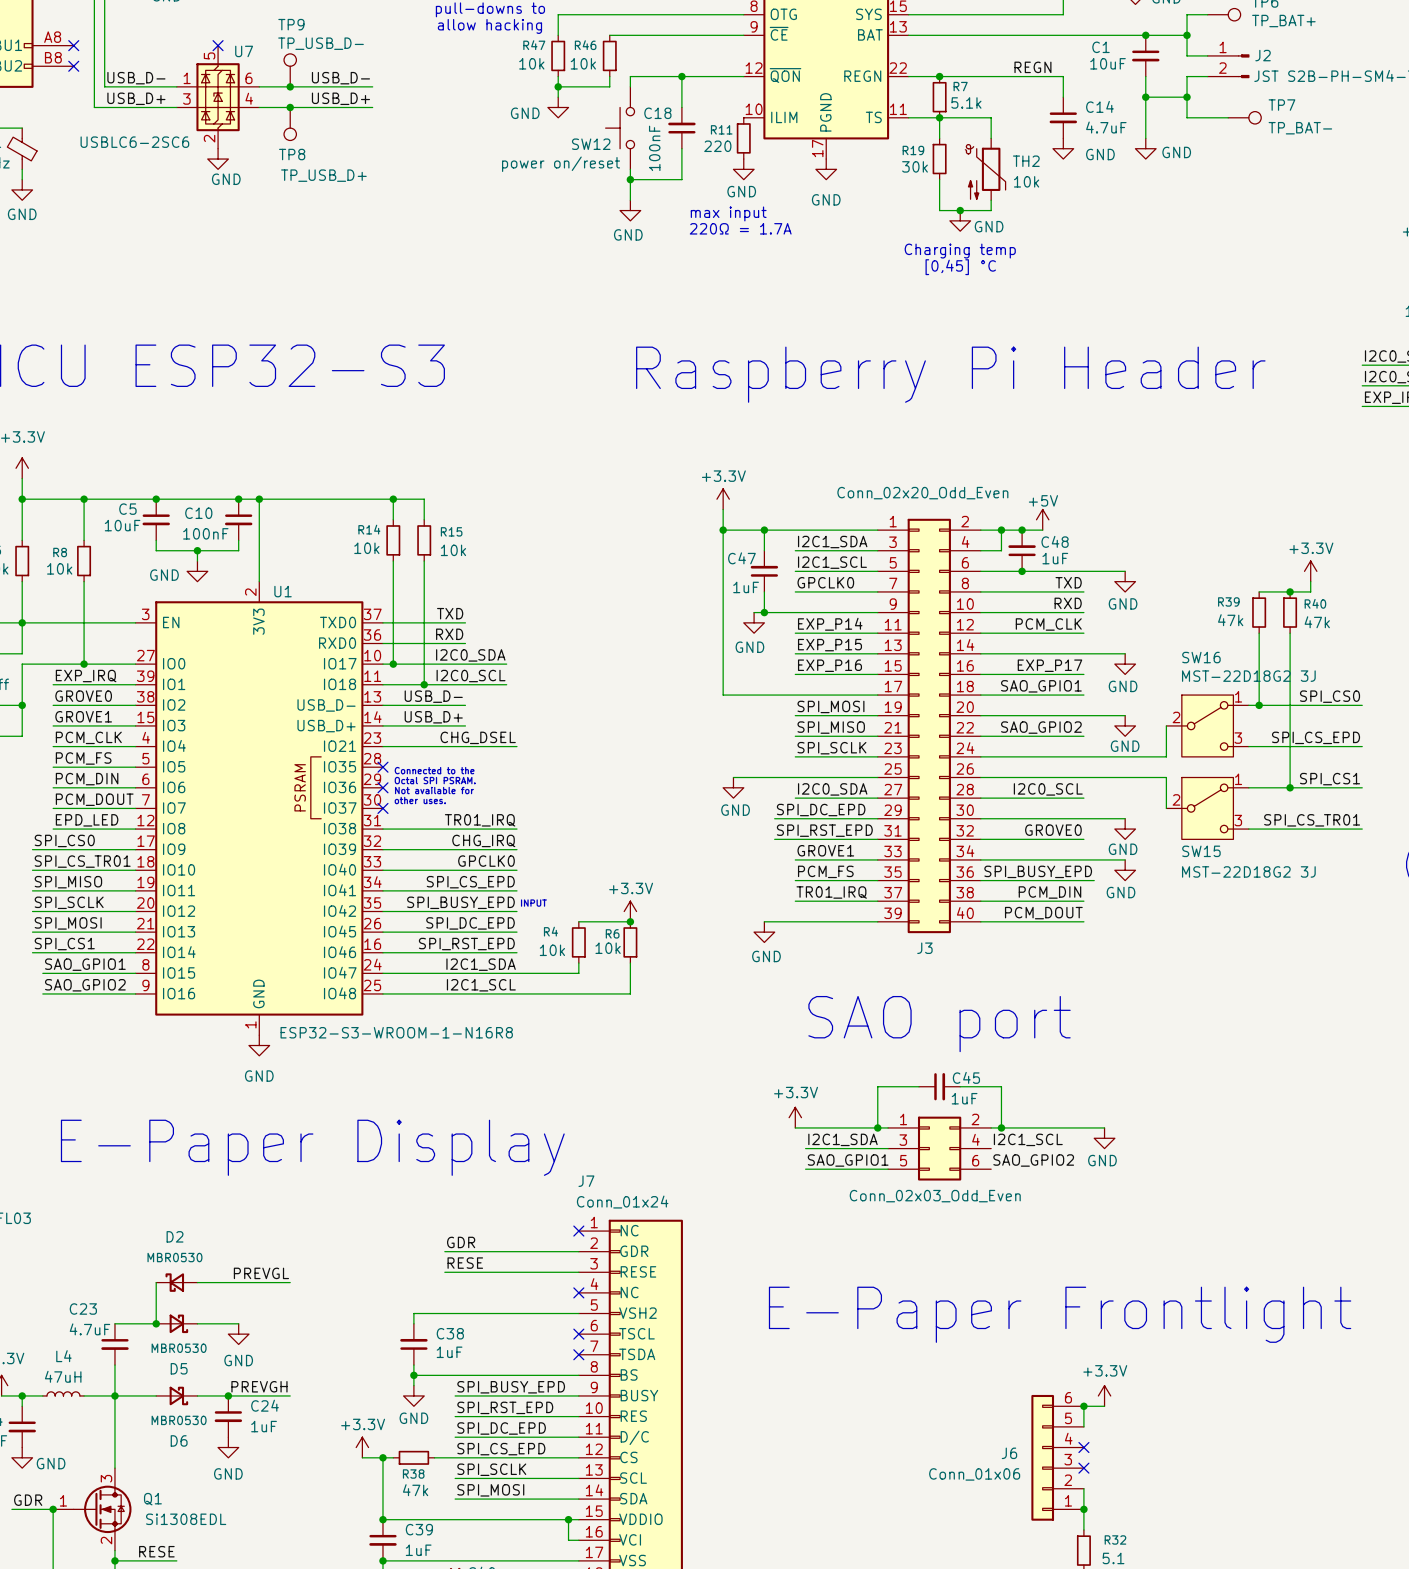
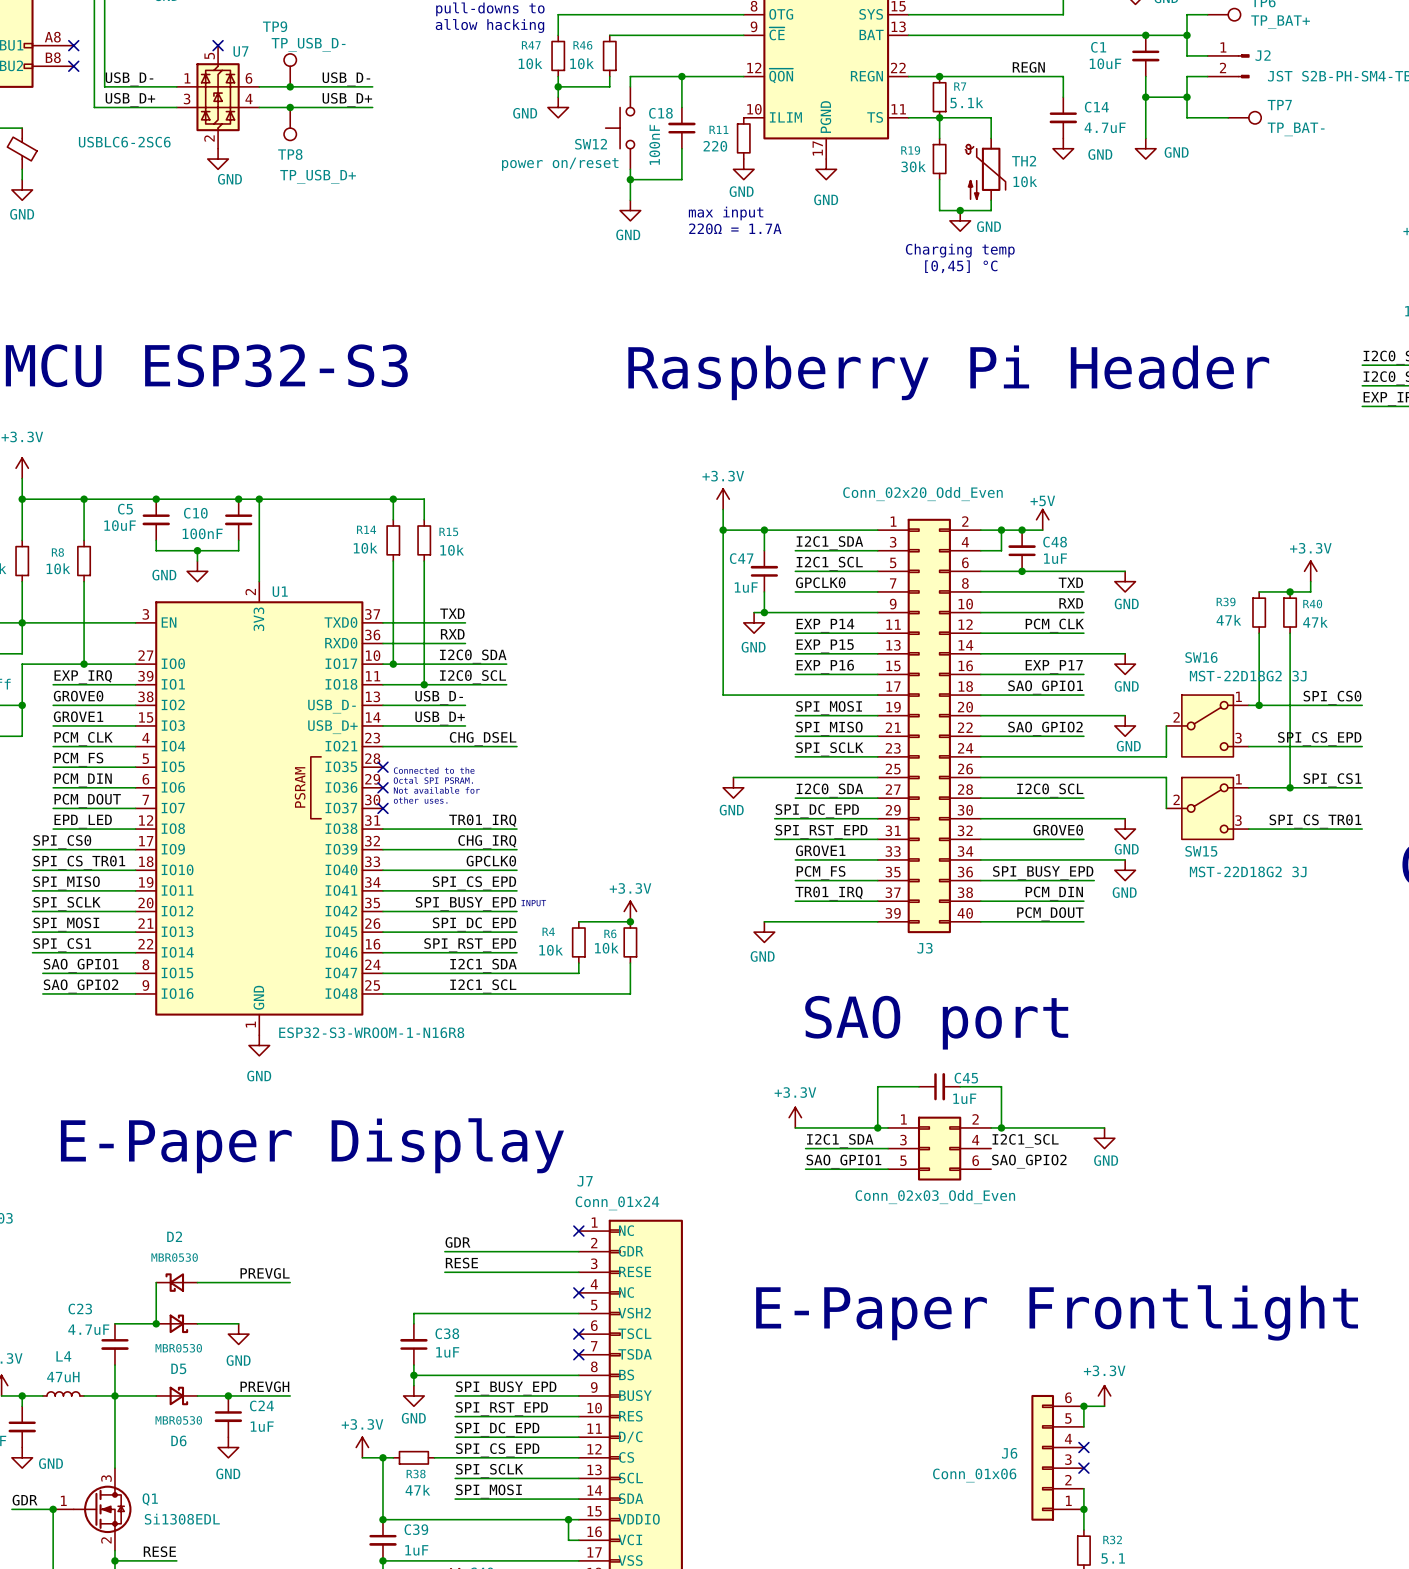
TP9 name position: TP9 (291, 24) -> TP9 (275, 26)
TP9 value position: TP_USB_D- (321, 43) -> TP_USB_D- (308, 44)

